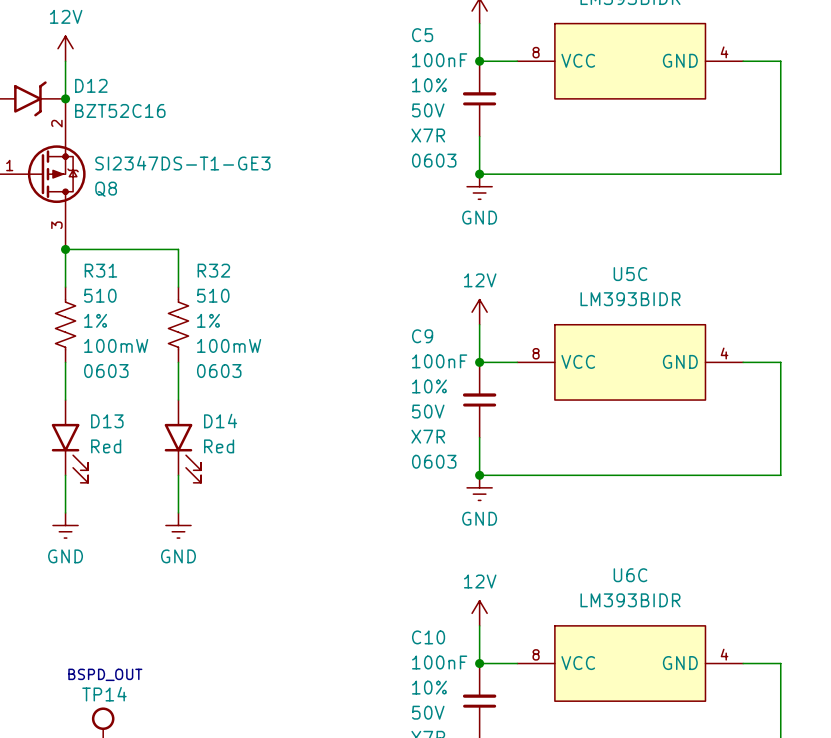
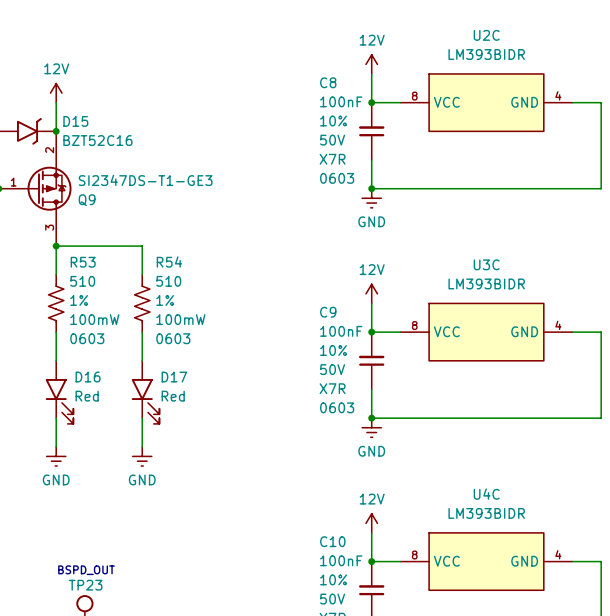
C5 name: C5 (422, 35) -> C8 (328, 82)
D12 name: D12 (91, 85) -> D15 (75, 121)
Q8 name: Q8 (106, 189) -> Q9 (87, 200)
R31 name: R31 (100, 270) -> R53 (83, 262)
R32 name: R32 (213, 270) -> R54 (169, 262)
U5C name: U5C (630, 274) -> U3C (486, 264)
D13 name: D13 (107, 421) -> D16 (88, 377)
D14 name: D14 (220, 421) -> D17 (174, 377)
U6C name: U6C (630, 575) -> U4C (486, 494)
TP14 name: TP14 (104, 694) -> TP23 (85, 585)

